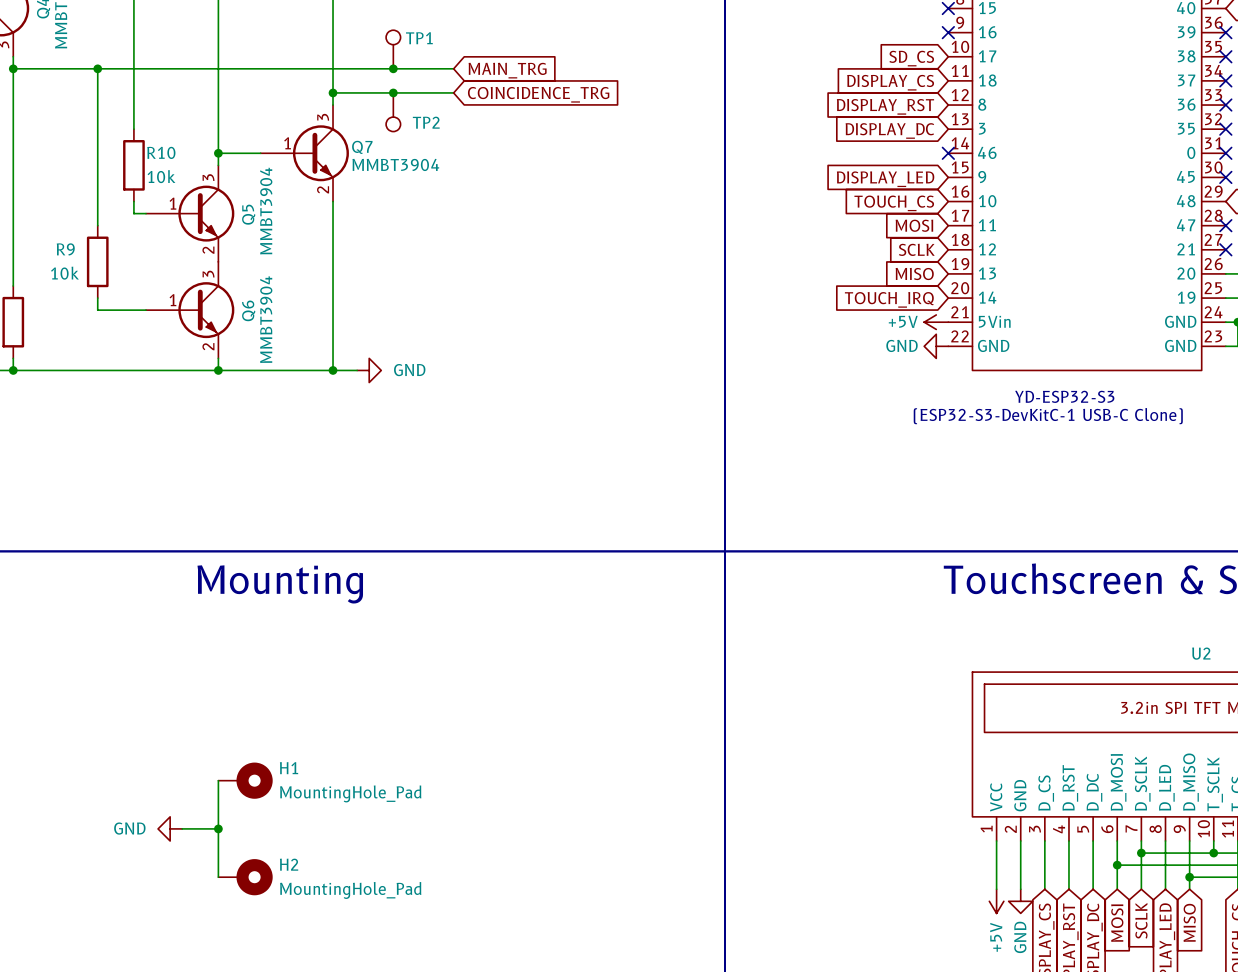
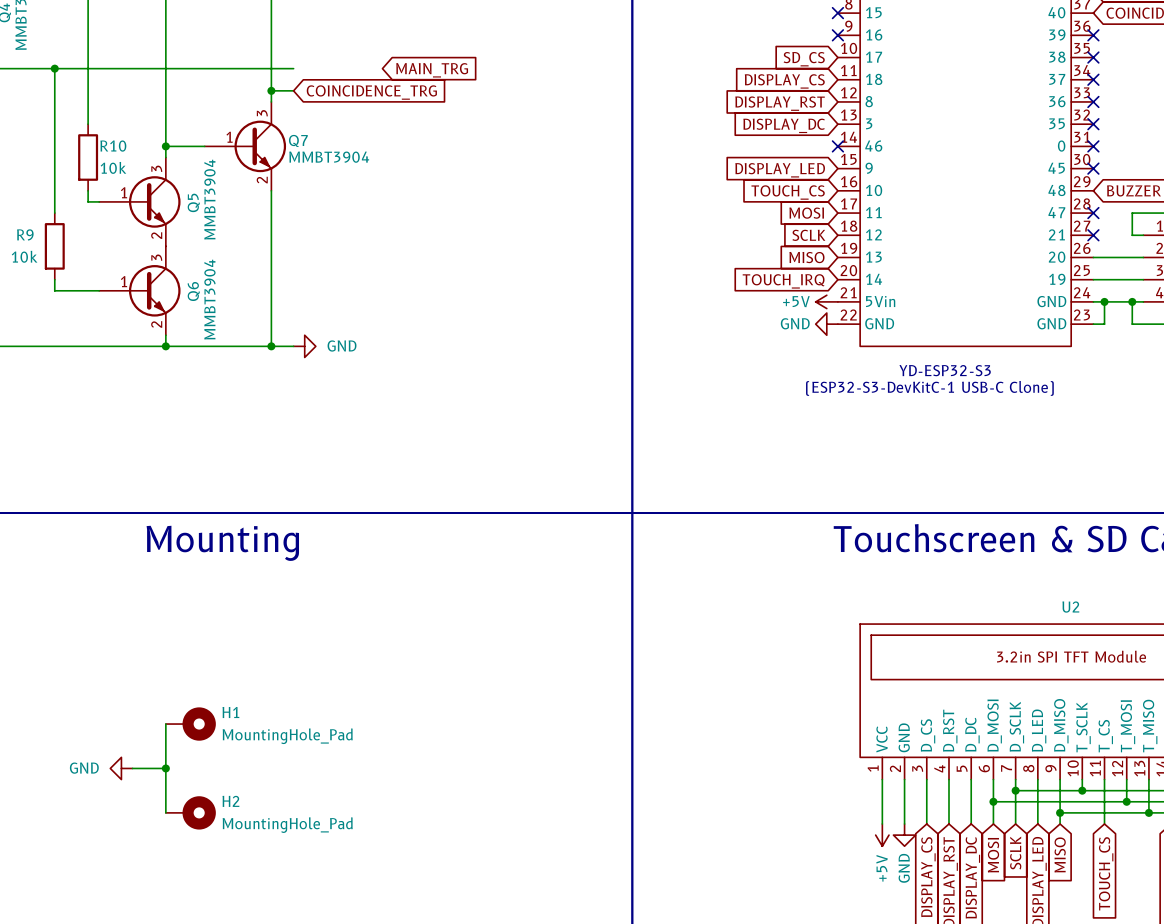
TP1: (393, 49) -> none
wire: (357, 68) (453, 68) -> none
junction: (393, 68) -> none
wire: (357, 92) (453, 92) -> none
junction: (393, 92) -> none
global label position: COINCIDENCE_TRG (538, 94) -> COINCIDENCE_TRG (371, 92)
TP2: (393, 112) -> none

